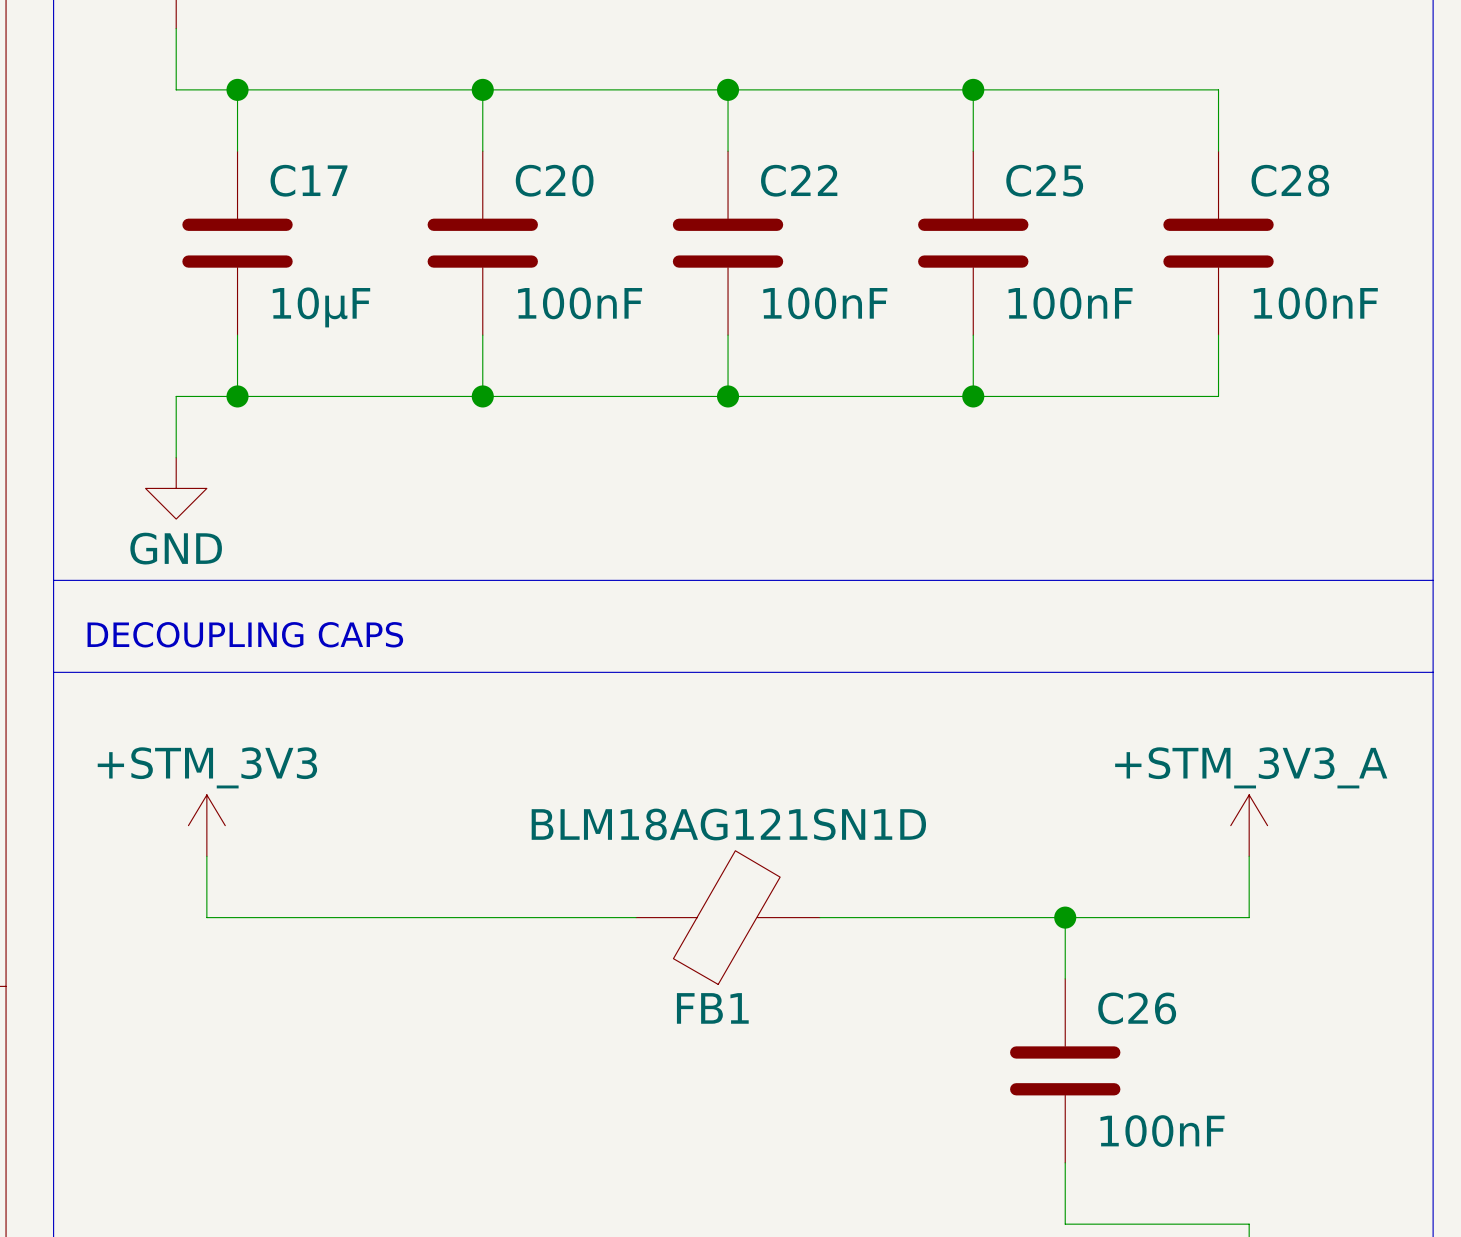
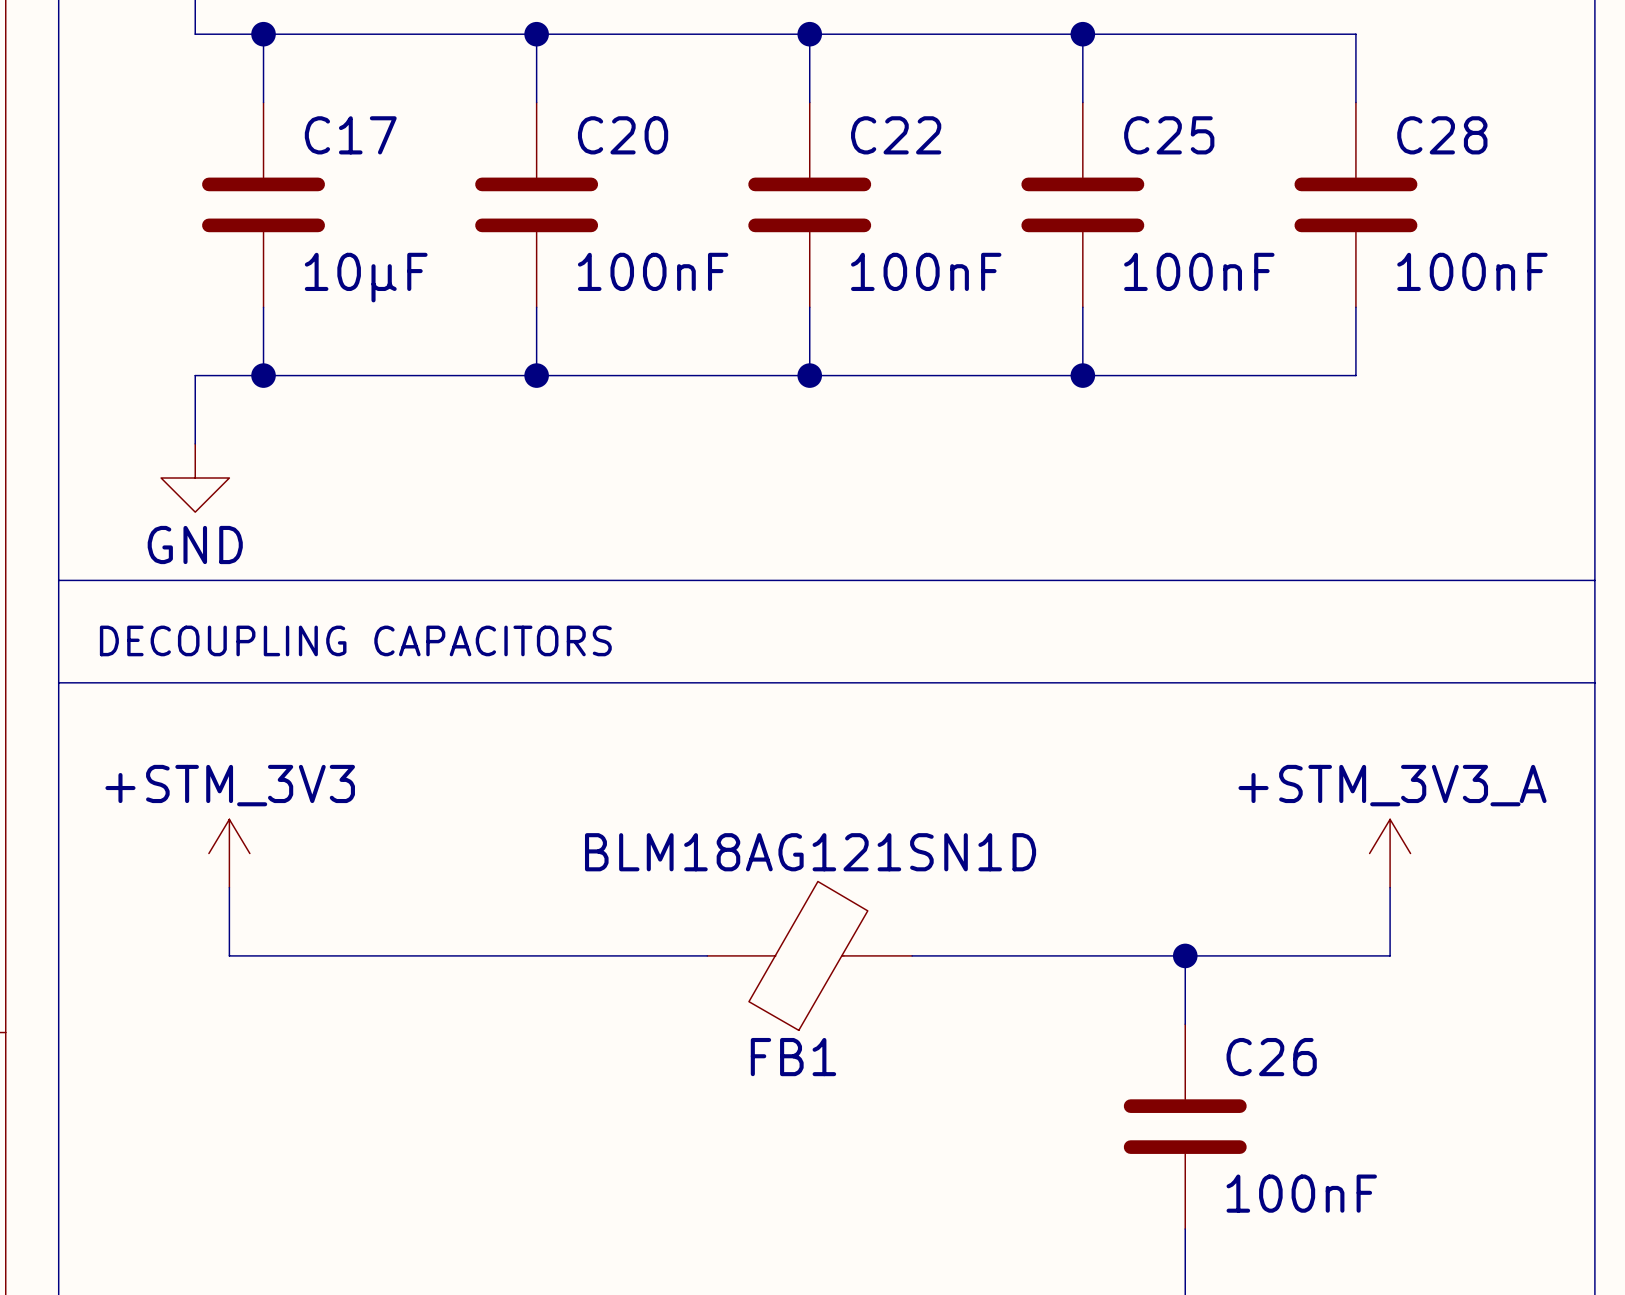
text: DECOUPLING CAPS (245, 634) -> DECOUPLING CAPACITORS (355, 640)

